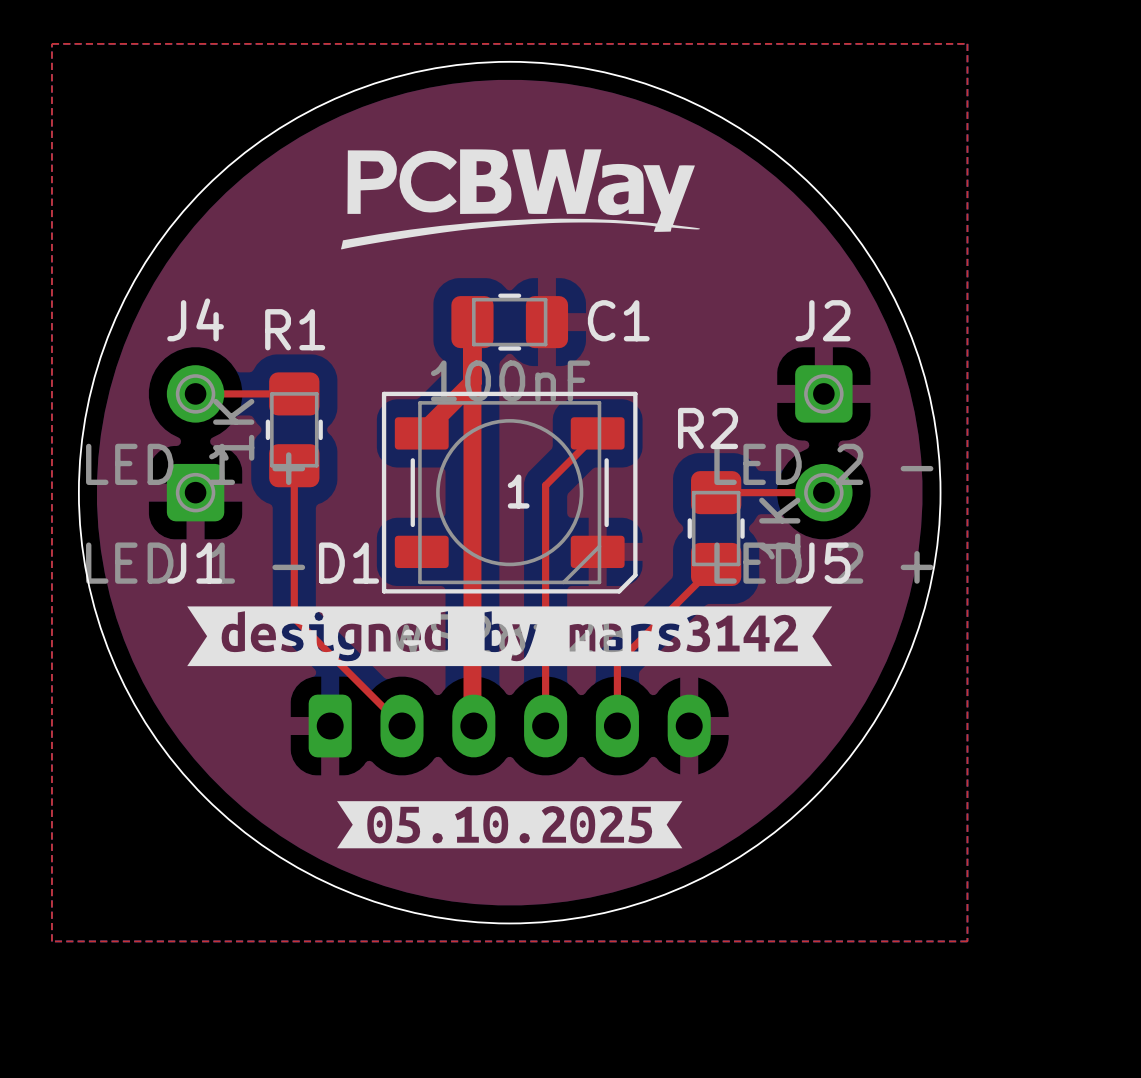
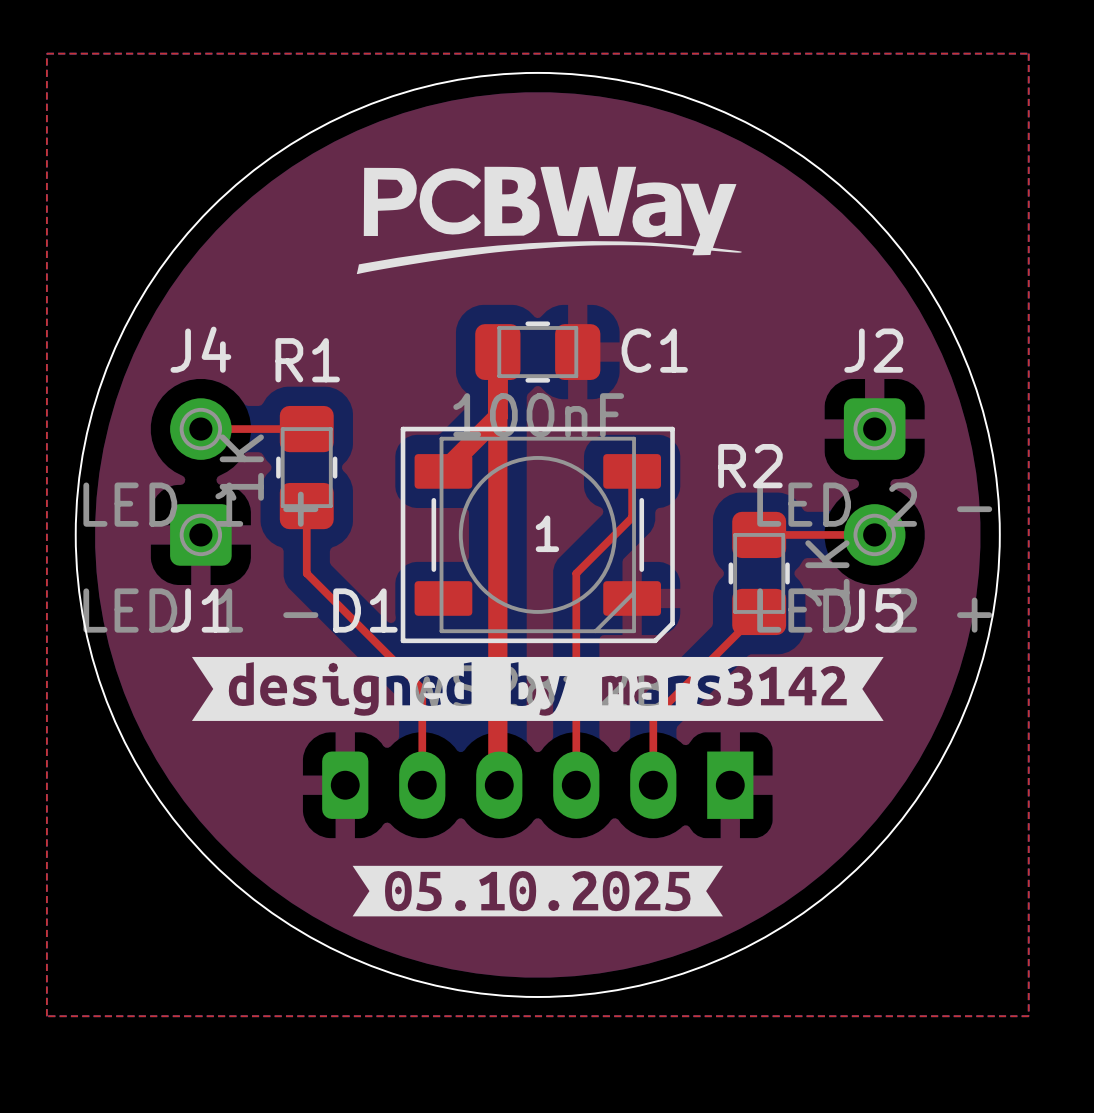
top track: (597, 433) (545, 485) (545, 528) -> (632, 471) (632, 517) (576, 573)
top track: (294, 528) (294, 618) (402, 726) -> (306, 573) (422, 688) (422, 785)
part footprint: [308, 694, 711, 758] -> [322, 751, 754, 819]

